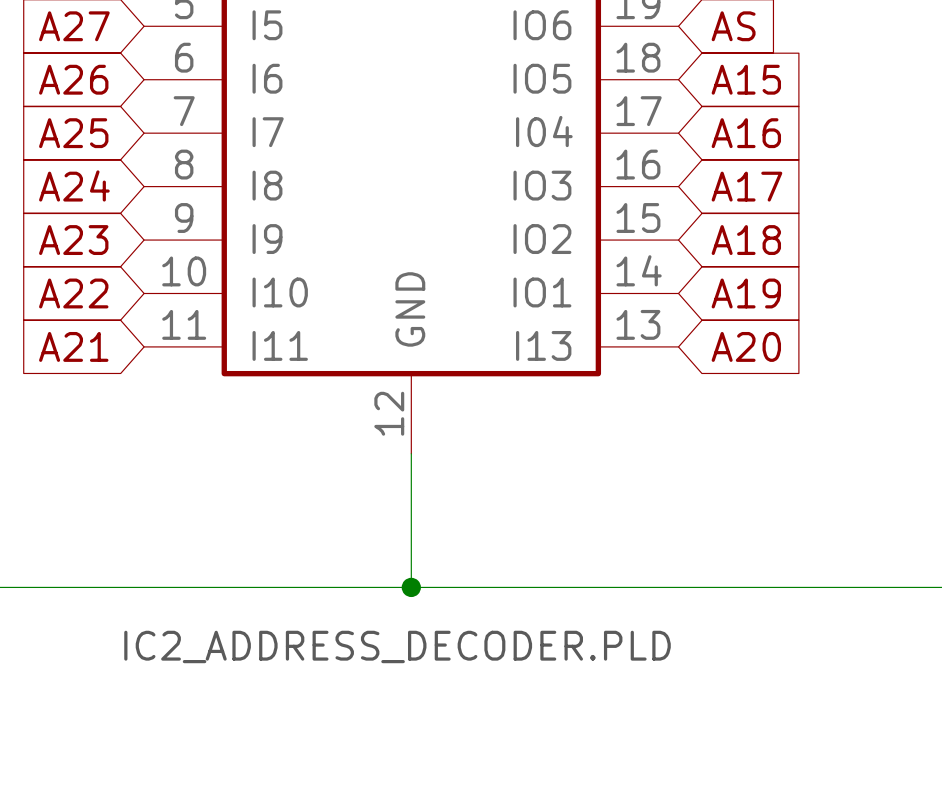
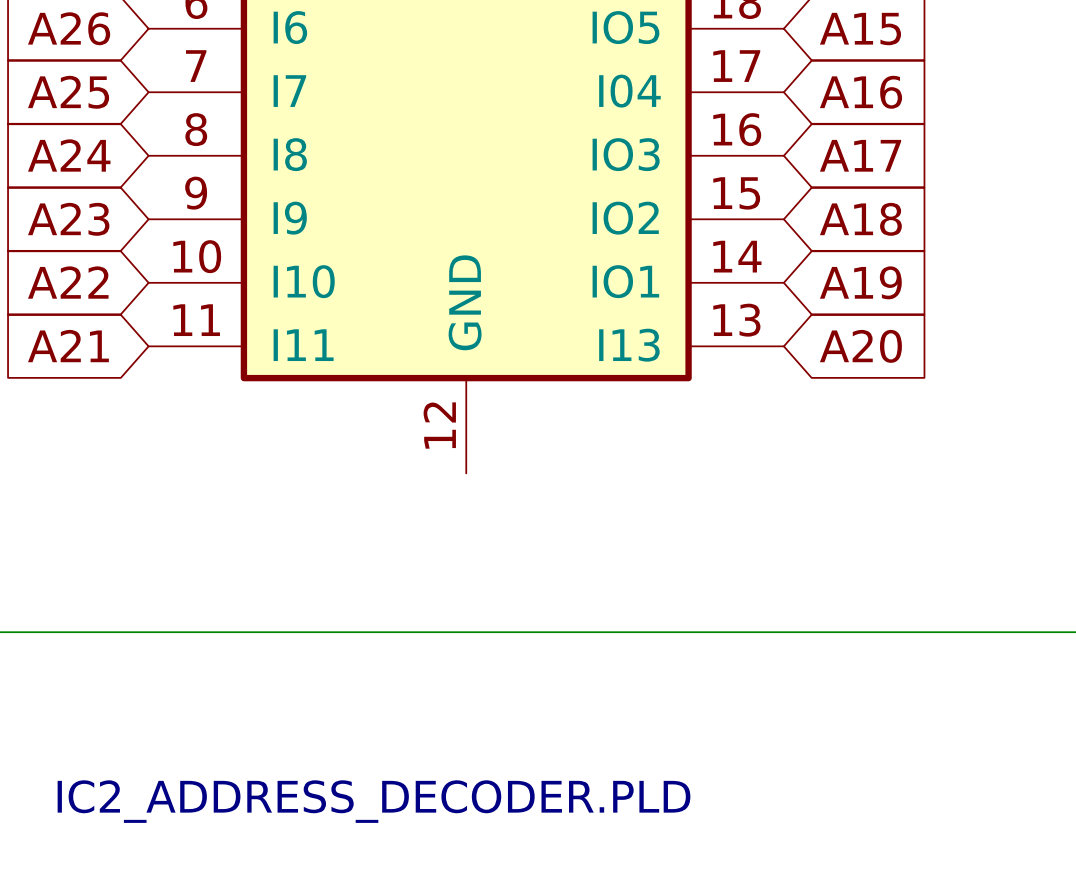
wire: (411, 453) (411, 587) -> none
junction: (411, 587) -> none
text position: IC2_ADDRESS_DECODER.PLD (397, 646) -> IC2_ADDRESS_DECODER.PLD (374, 801)

